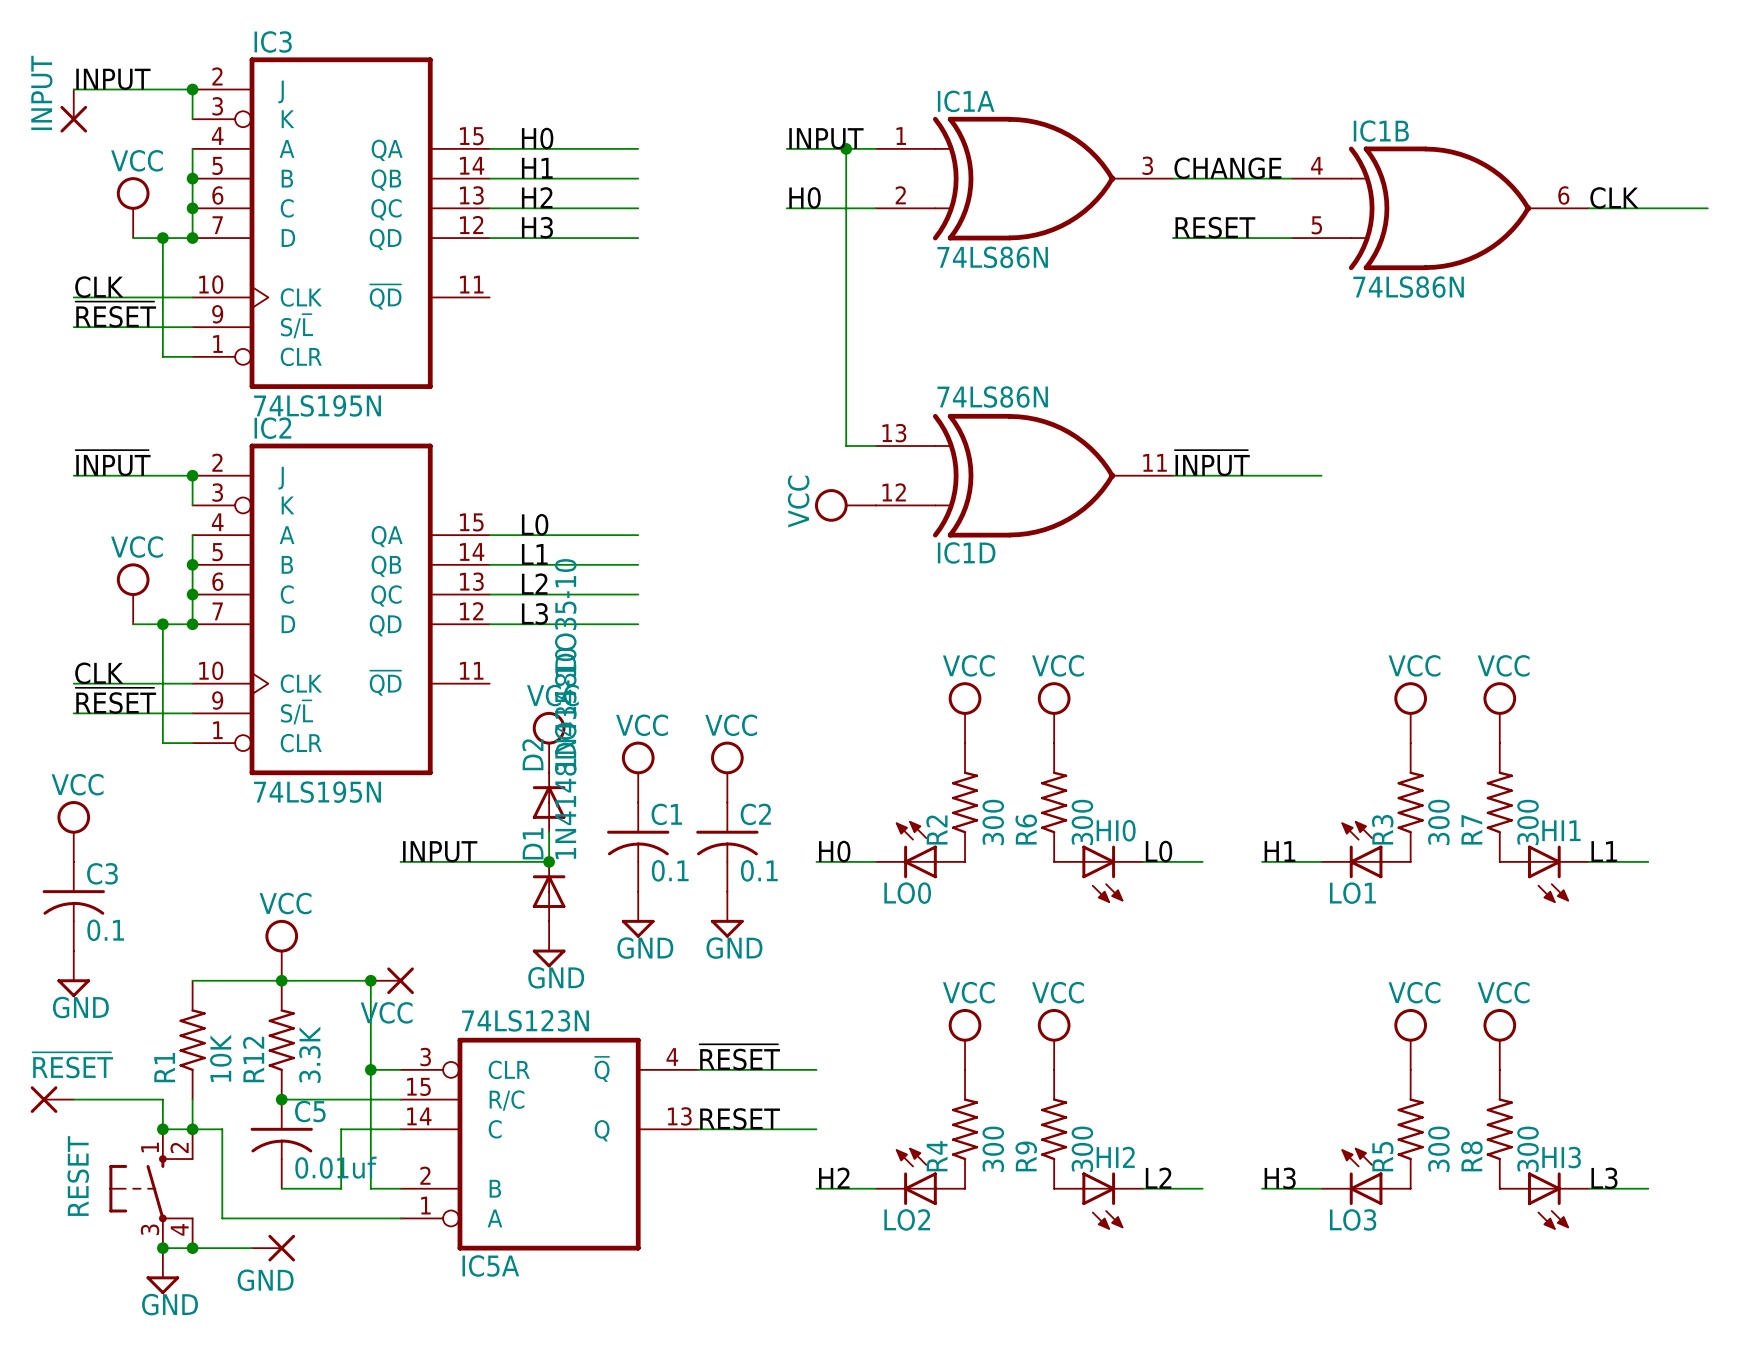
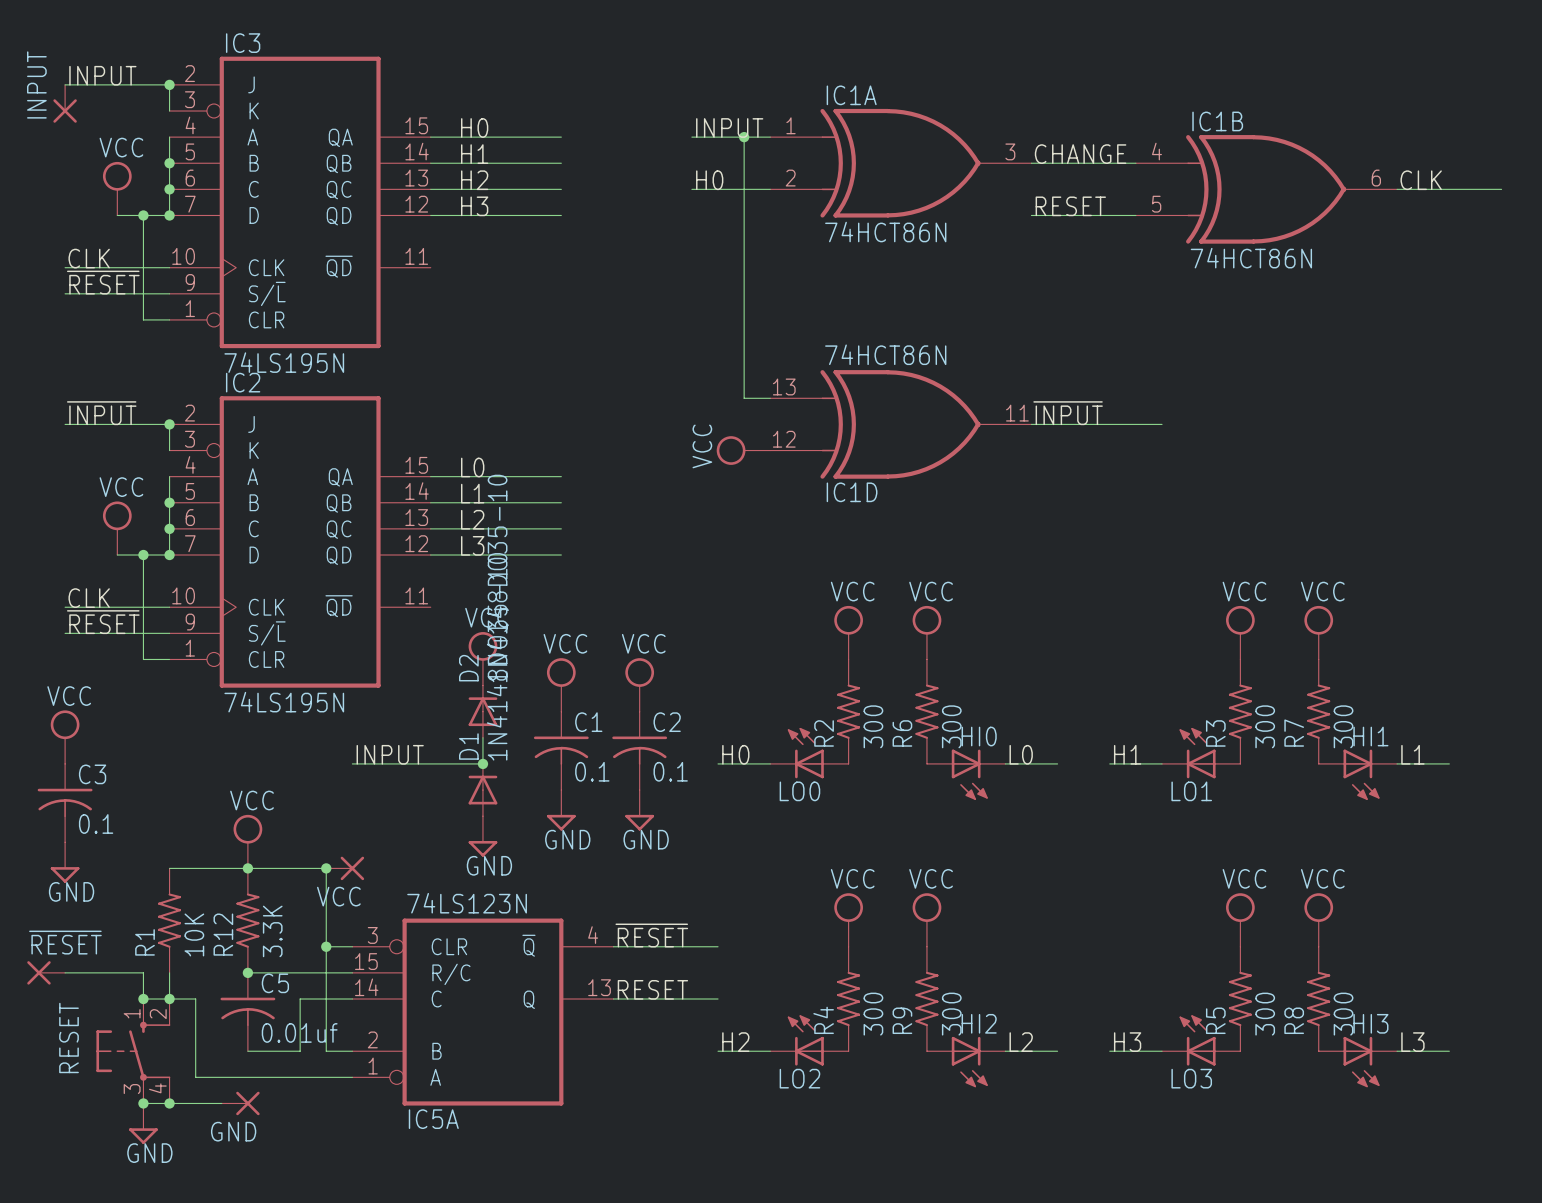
IC1A value: 74LS86N (992, 257) -> 74HCT86N (885, 232)
IC1B value: 74LS86N (1408, 287) -> 74HCT86N (1251, 258)
IC1D value: 74LS86N (992, 397) -> 74HCT86N (885, 354)

